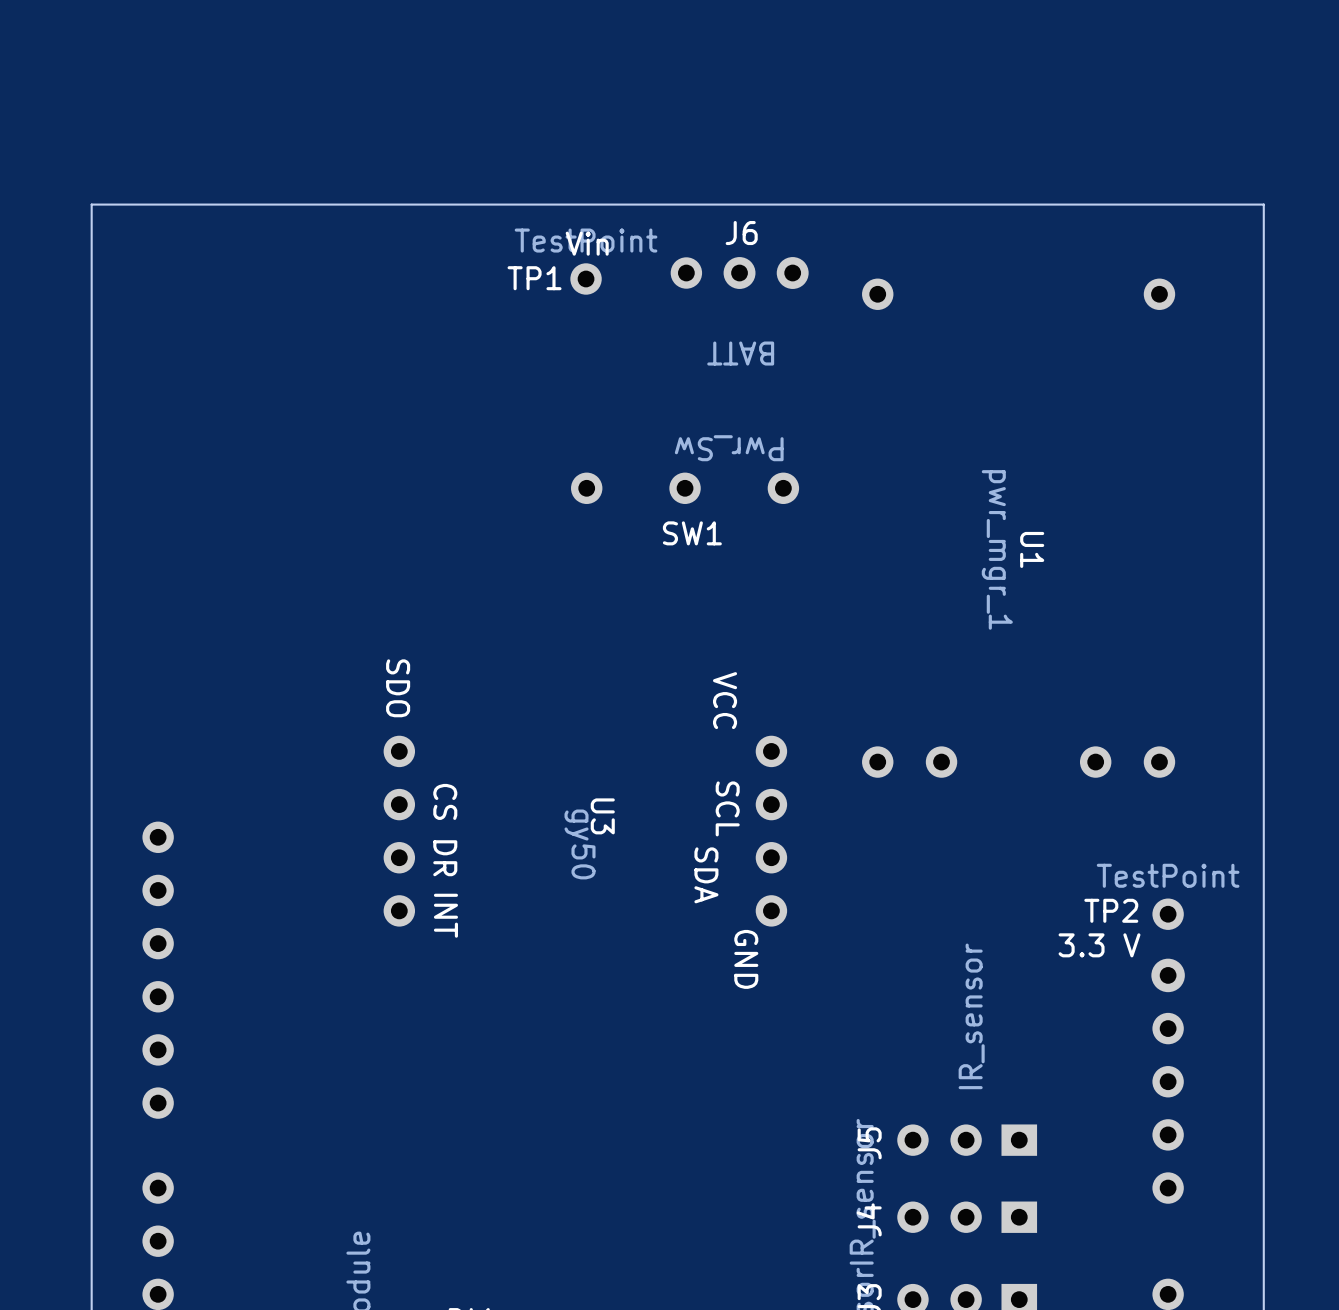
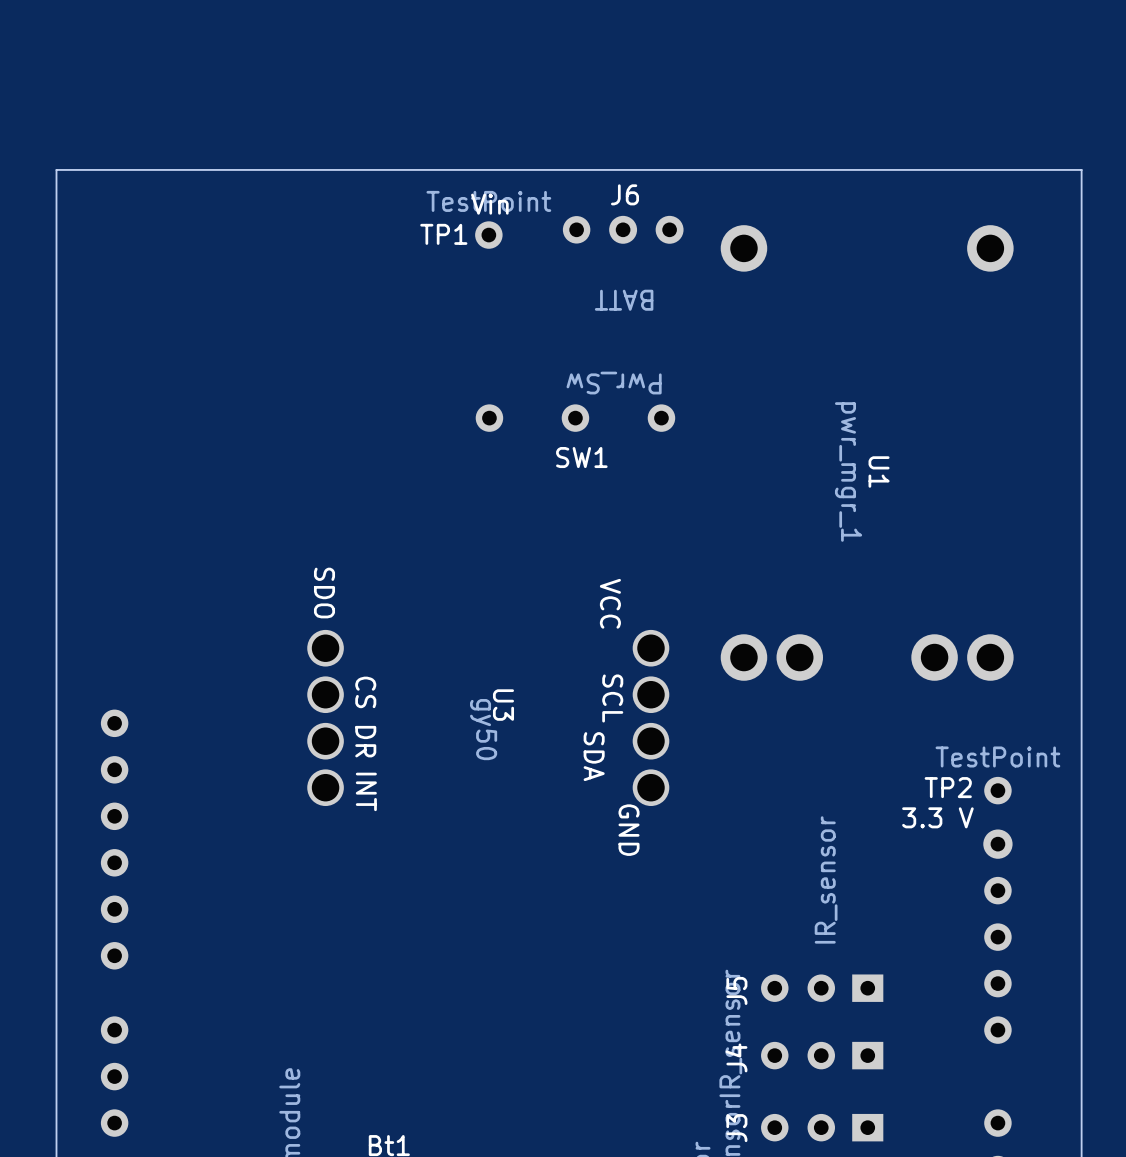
U1 footprint: [862, 278, 1176, 778] -> [720, 225, 1014, 681]
U3 footprint: [383, 735, 788, 927] -> [307, 629, 670, 807]

